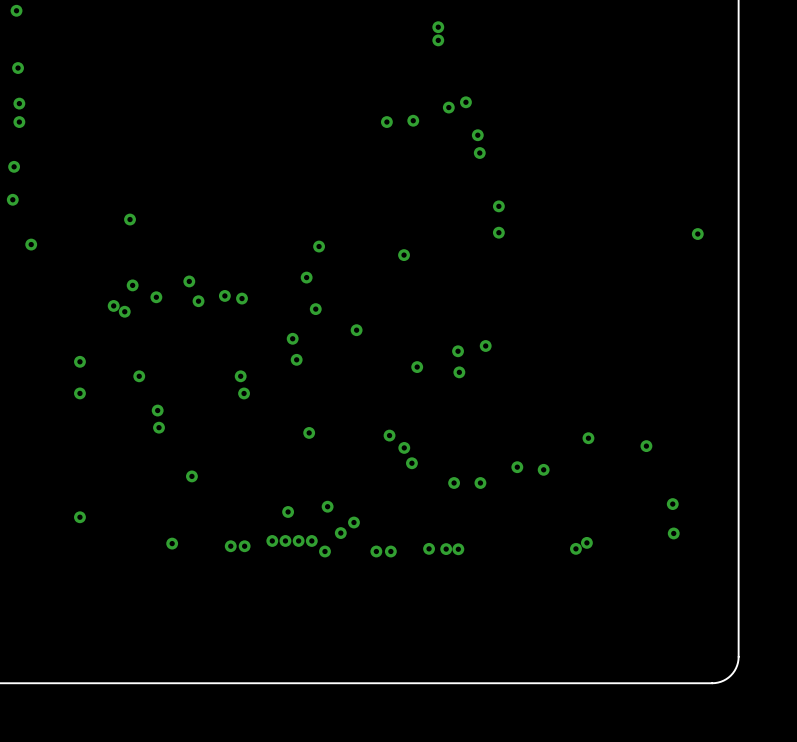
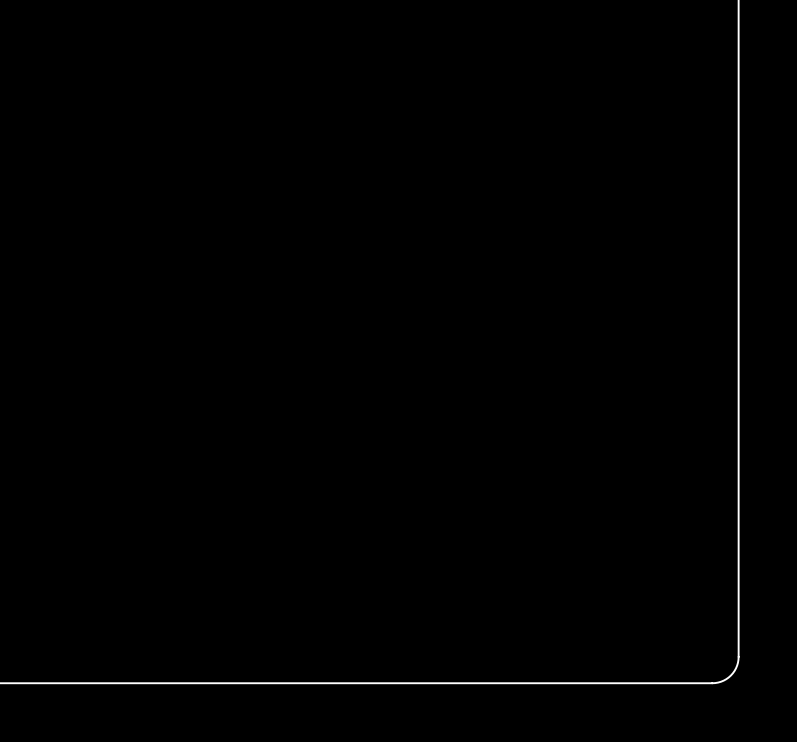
via: (16, 10) -> none
via: (438, 27) -> none
via: (438, 40) -> none
via: (18, 68) -> none
via: (465, 102) -> none
via: (19, 103) -> none
via: (448, 107) -> none
via: (413, 120) -> none
via: (19, 122) -> none
via: (386, 122) -> none
via: (477, 135) -> none
via: (479, 153) -> none
via: (14, 166) -> none
via: (12, 199) -> none
via: (498, 206) -> none
via: (130, 219) -> none
via: (498, 232) -> none
via: (697, 234) -> none
via: (31, 244) -> none
via: (319, 246) -> none
via: (404, 255) -> none
via: (306, 277) -> none
via: (189, 281) -> none
via: (132, 285) -> none
via: (224, 295) -> none
via: (156, 297) -> none
via: (241, 298) -> none
via: (198, 301) -> none
via: (113, 305) -> none
via: (315, 309) -> none
via: (124, 311) -> none
via: (356, 330) -> none
via: (292, 338) -> none
via: (485, 345) -> none
via: (458, 351) -> none
via: (296, 359) -> none
via: (79, 361) -> none
via: (417, 367) -> none
via: (459, 372) -> none
via: (139, 376) -> none
via: (240, 376) -> none
via: (79, 393) -> none
via: (244, 393) -> none
via: (157, 410) -> none
via: (159, 427) -> none
via: (309, 432) -> none
via: (389, 435) -> none
via: (588, 438) -> none
via: (646, 446) -> none
via: (404, 447) -> none
via: (411, 463) -> none
via: (517, 467) -> none
via: (543, 469) -> none
via: (191, 476) -> none
via: (454, 483) -> none
via: (480, 483) -> none
via: (672, 504) -> none
via: (327, 506) -> none
via: (288, 511) -> none
via: (79, 517) -> none
via: (353, 522) -> none
via: (340, 533) -> none
via: (673, 533) -> none
via: (272, 540) -> none
via: (285, 540) -> none
via: (298, 540) -> none
via: (311, 540) -> none
via: (586, 542) -> none
via: (172, 543) -> none
via: (230, 546) -> none
via: (244, 546) -> none
via: (429, 548) -> none
via: (575, 548) -> none
via: (446, 549) -> none
via: (458, 549) -> none
via: (324, 551) -> none
via: (376, 551) -> none
via: (390, 551) -> none

